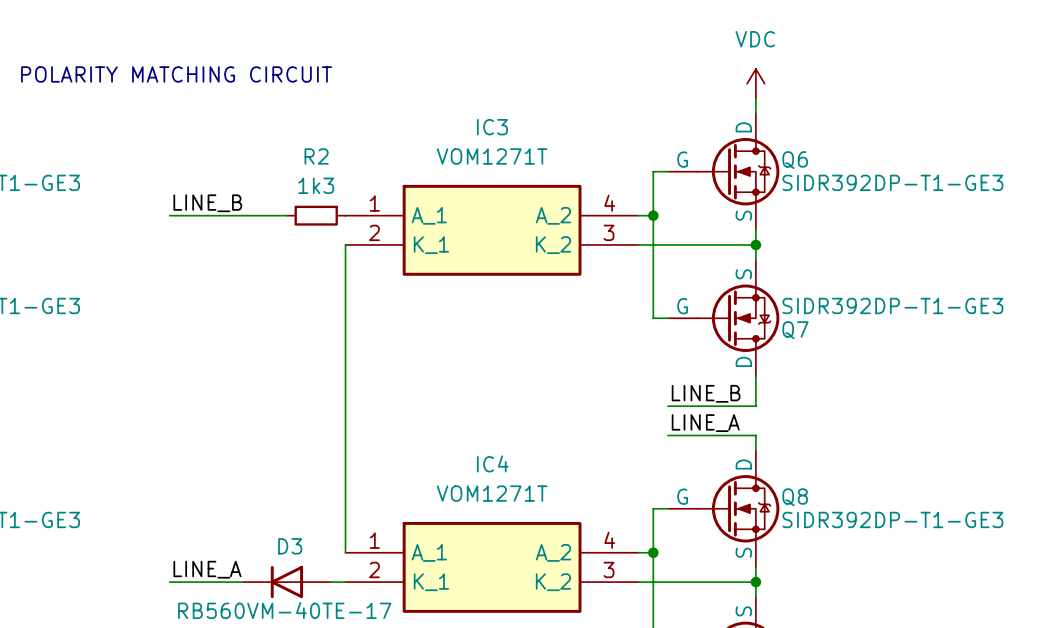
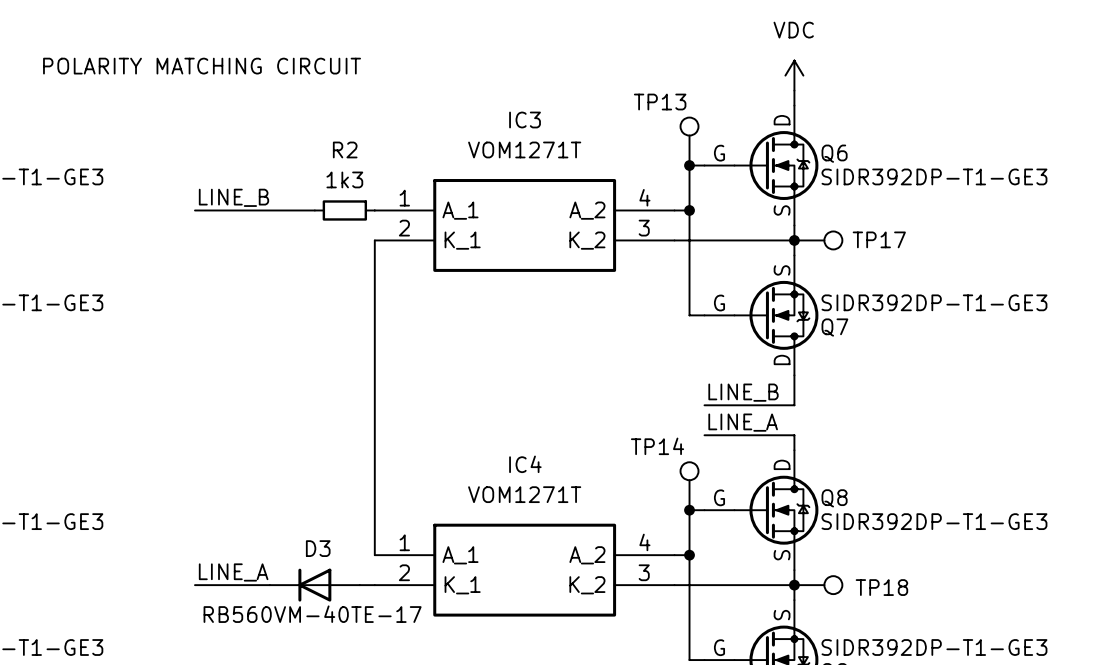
TP13: none -> (689, 141)
junction: none -> (689, 165)
TP17: none -> (818, 240)
TP14: none -> (689, 486)
junction: none -> (689, 510)
TP18: none -> (818, 585)

